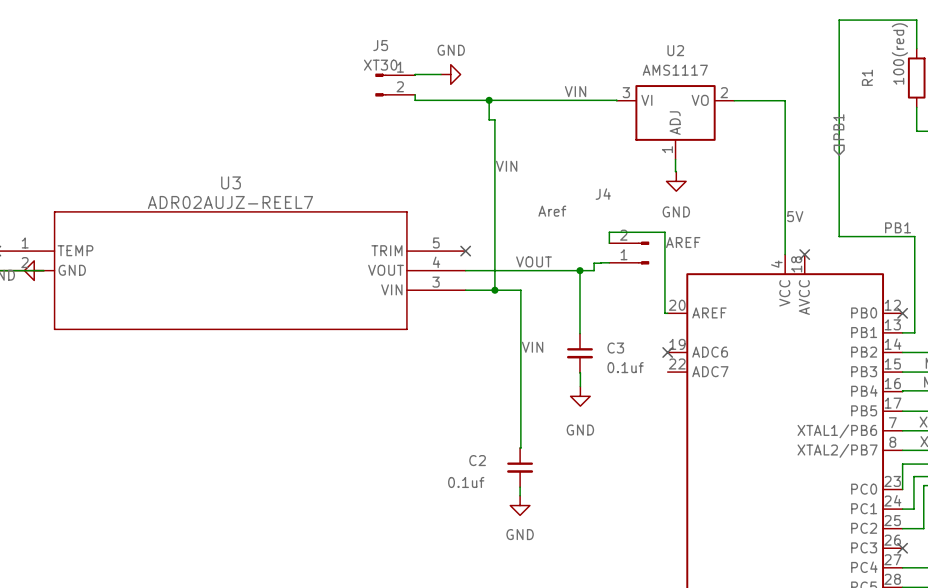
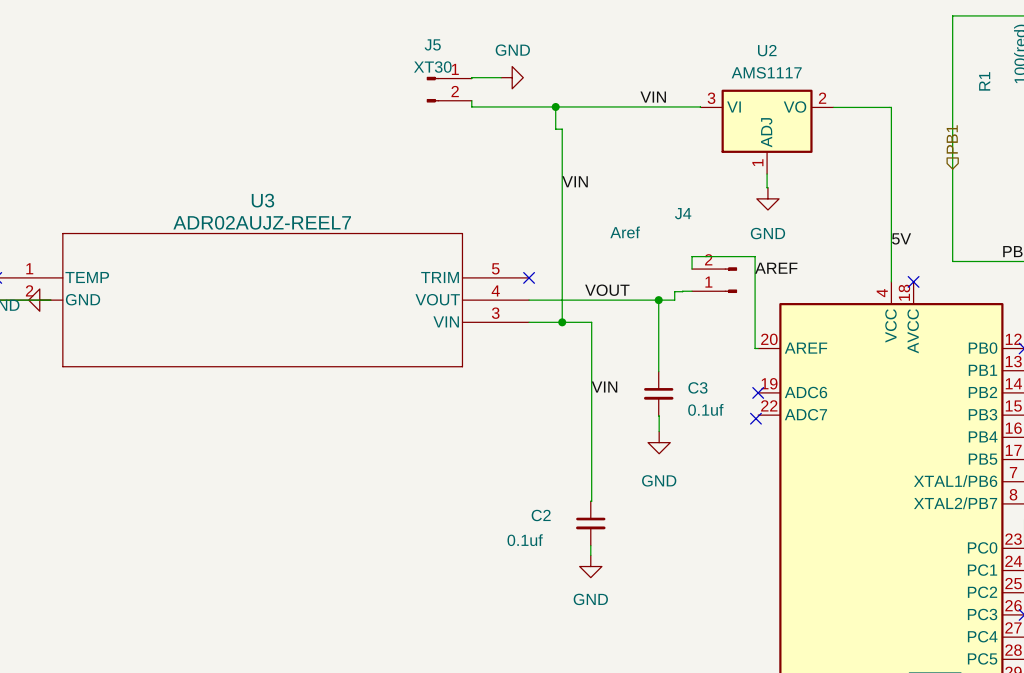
no-connect mark: none -> (755, 418)

